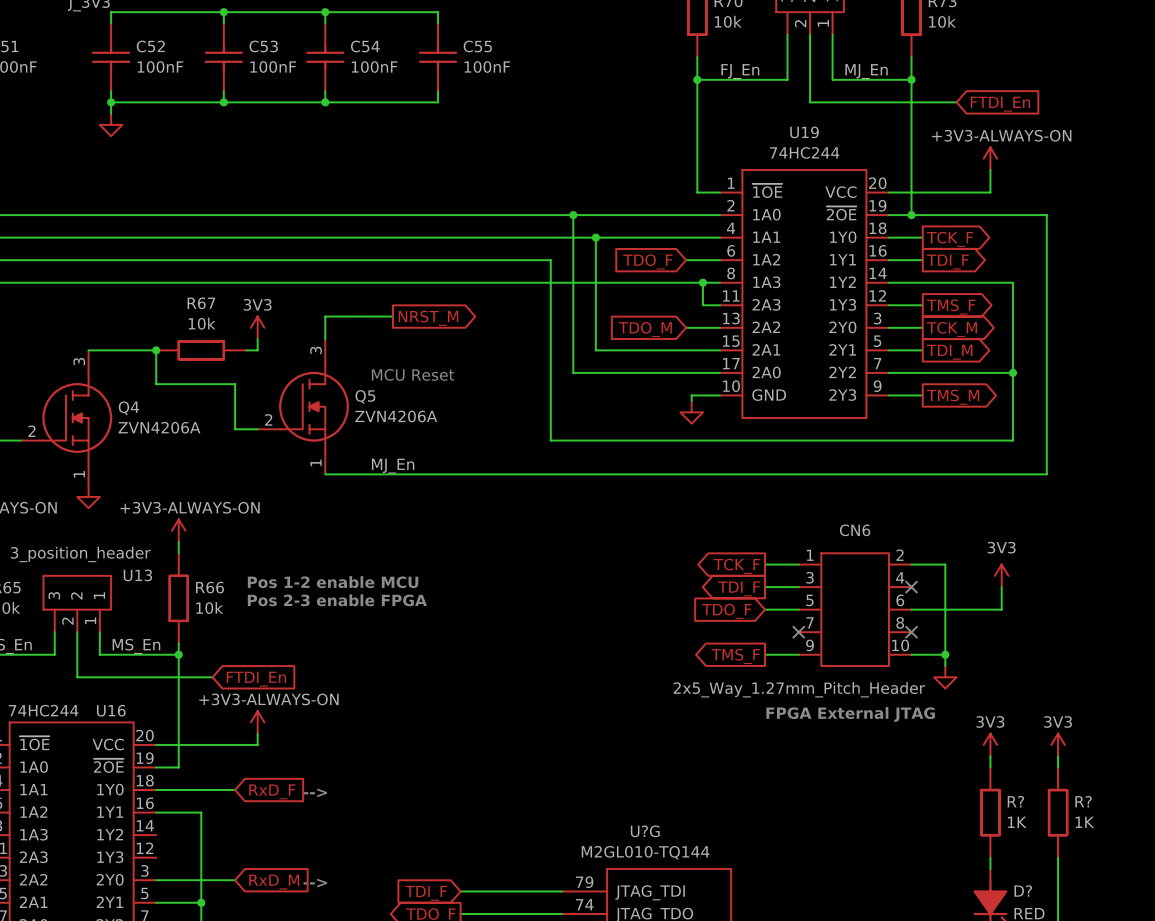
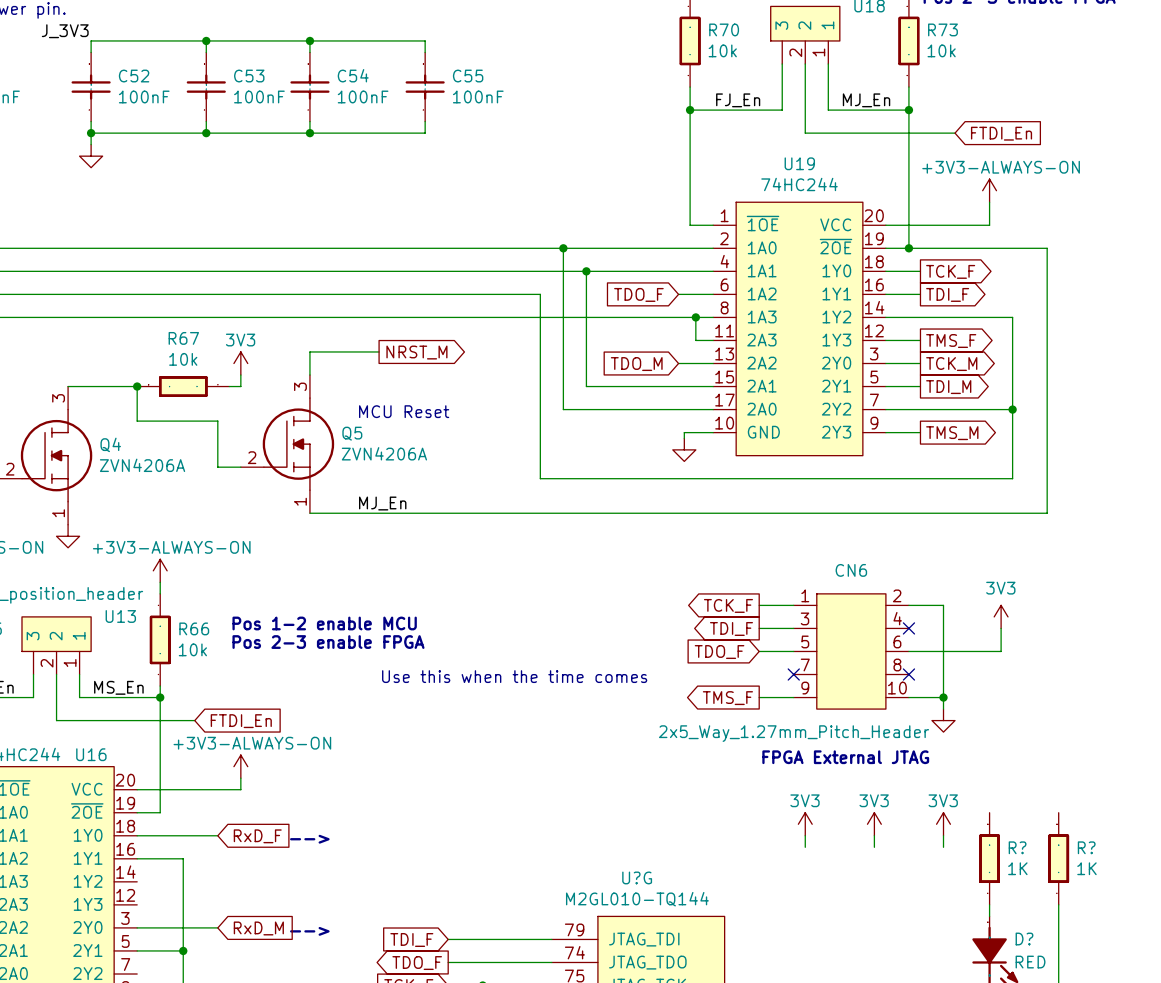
text: none -> Use this when the time comes (514, 676)
power symbol position: 3V3 (990, 744) -> 3V3 (943, 824)
power symbol: 3V3 (1058, 744) -> none
wire: (990, 756) (990, 767) -> (874, 835) (874, 847)
wire: (1058, 756) (1058, 767) -> (943, 835) (943, 847)
power symbol: none -> 3V3 (805, 824)
power symbol: none -> 3V3 (874, 824)
wire: none -> (805, 835) (805, 847)

